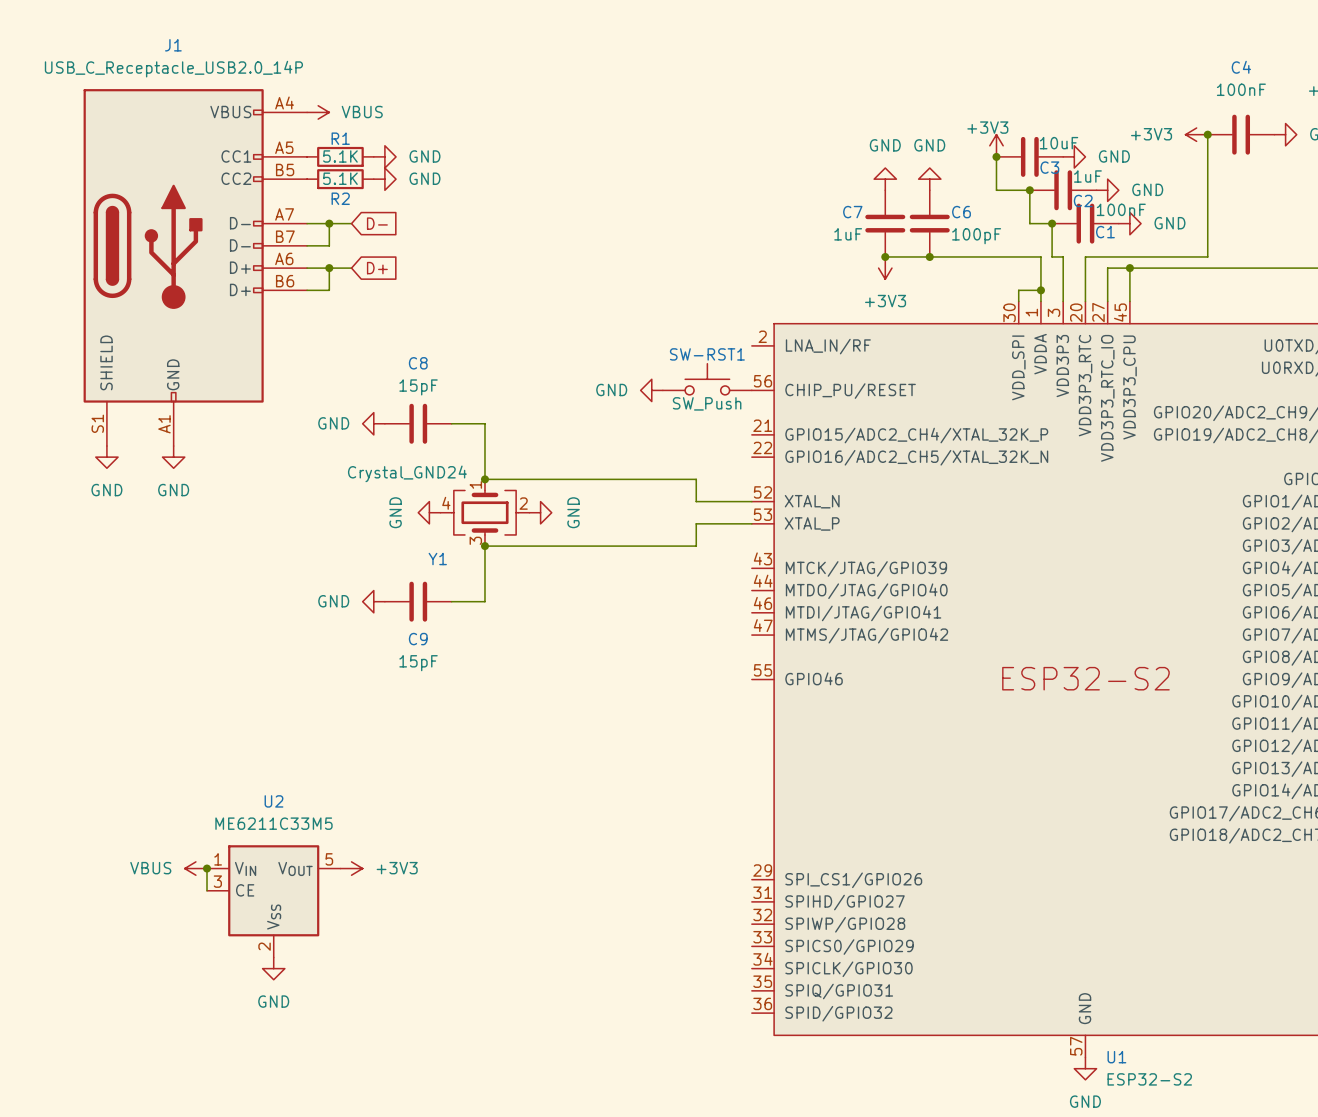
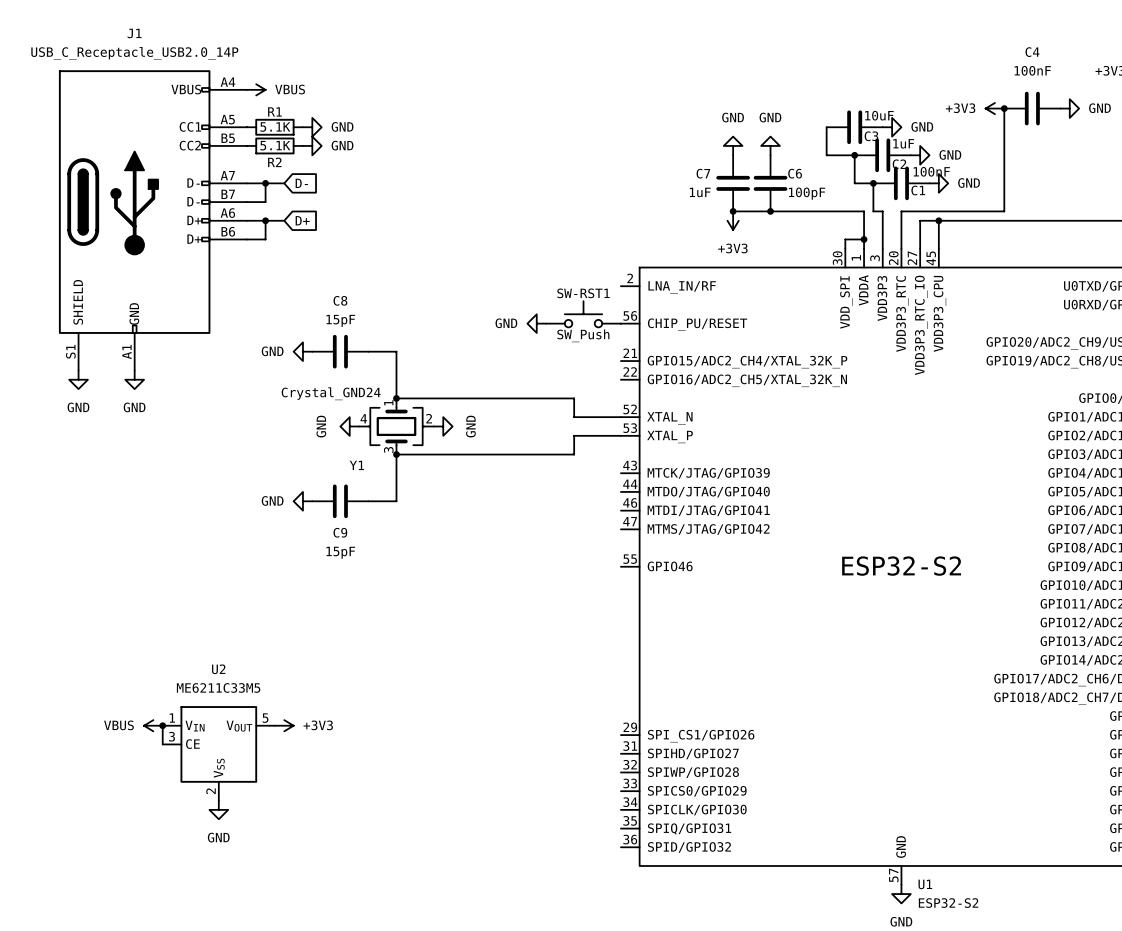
power symbol: +3V3 (996, 145) -> none
junction: (996, 156) -> none

